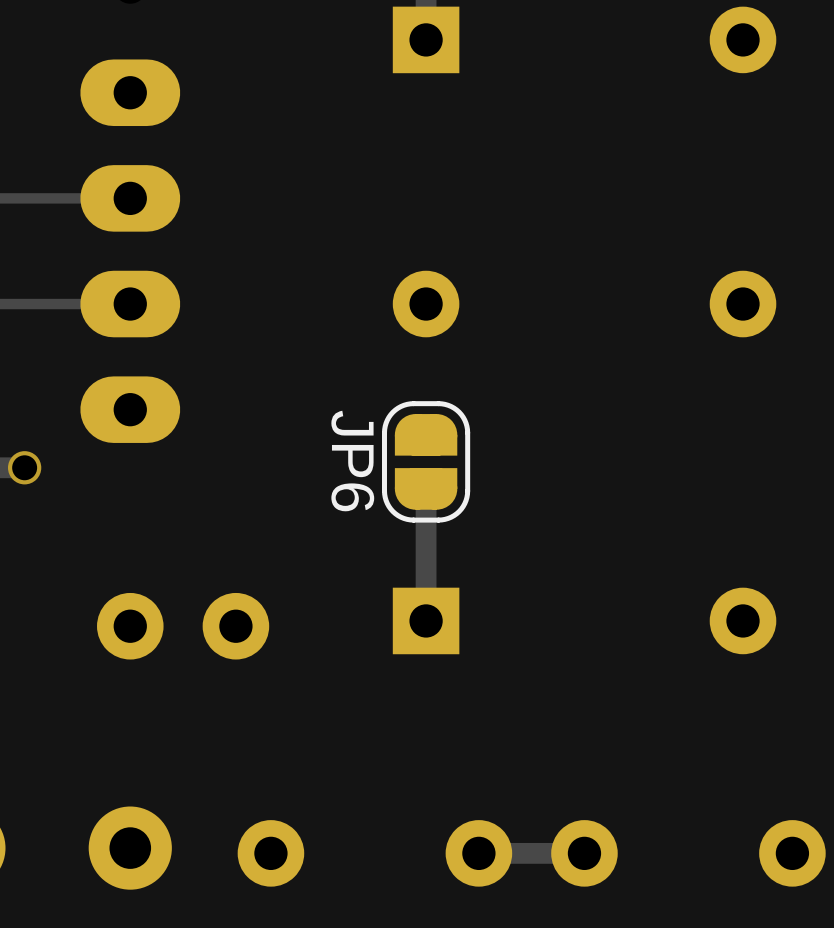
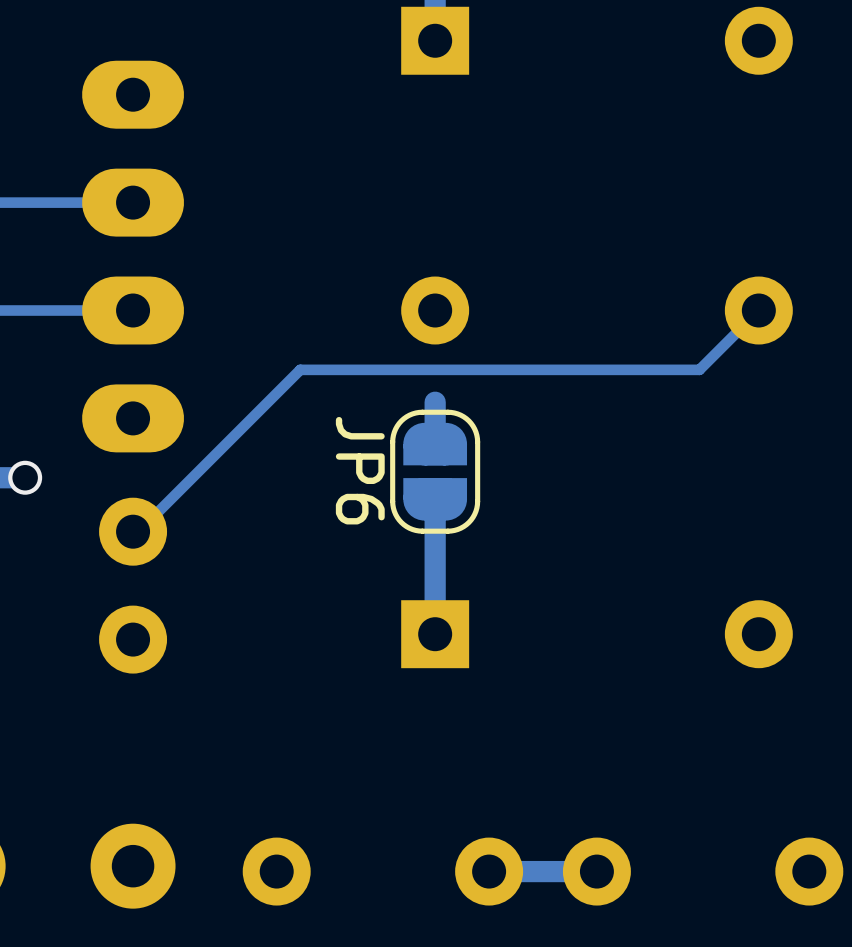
track: none -> (758, 310) (699, 369) (300, 369) (138, 531) (133, 531)
track: none -> (435, 402) (435, 444)
part rotation: 0° (183, 626) -> 90° clockwise (133, 585)

